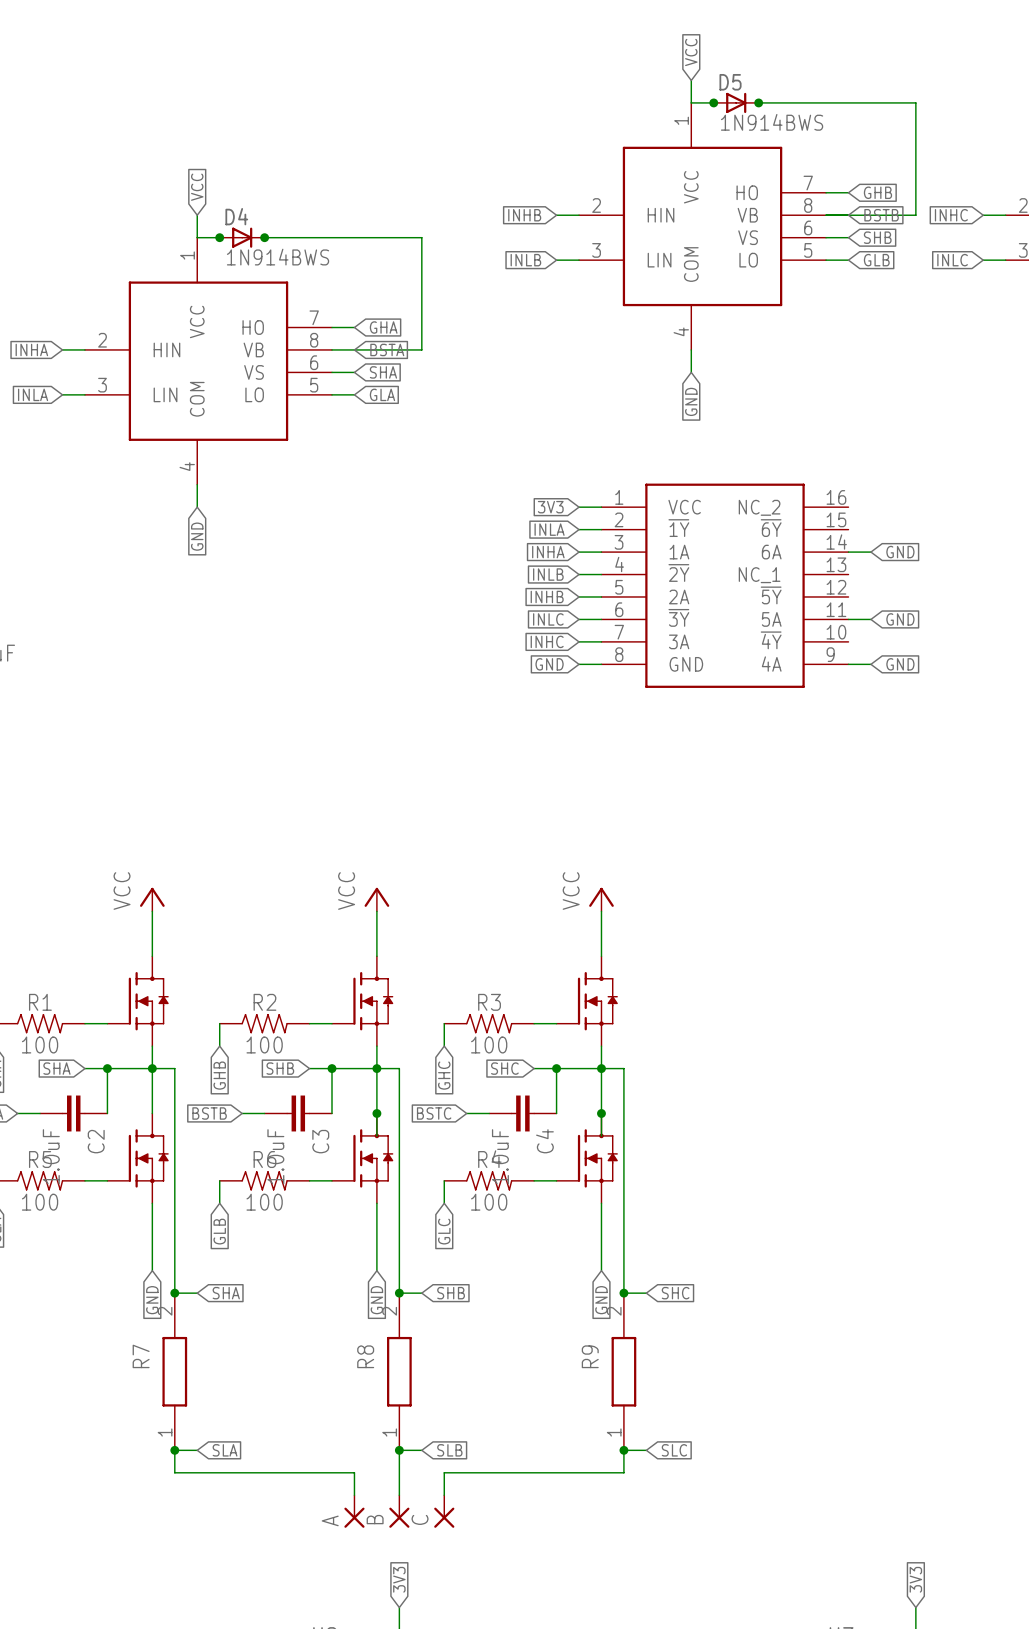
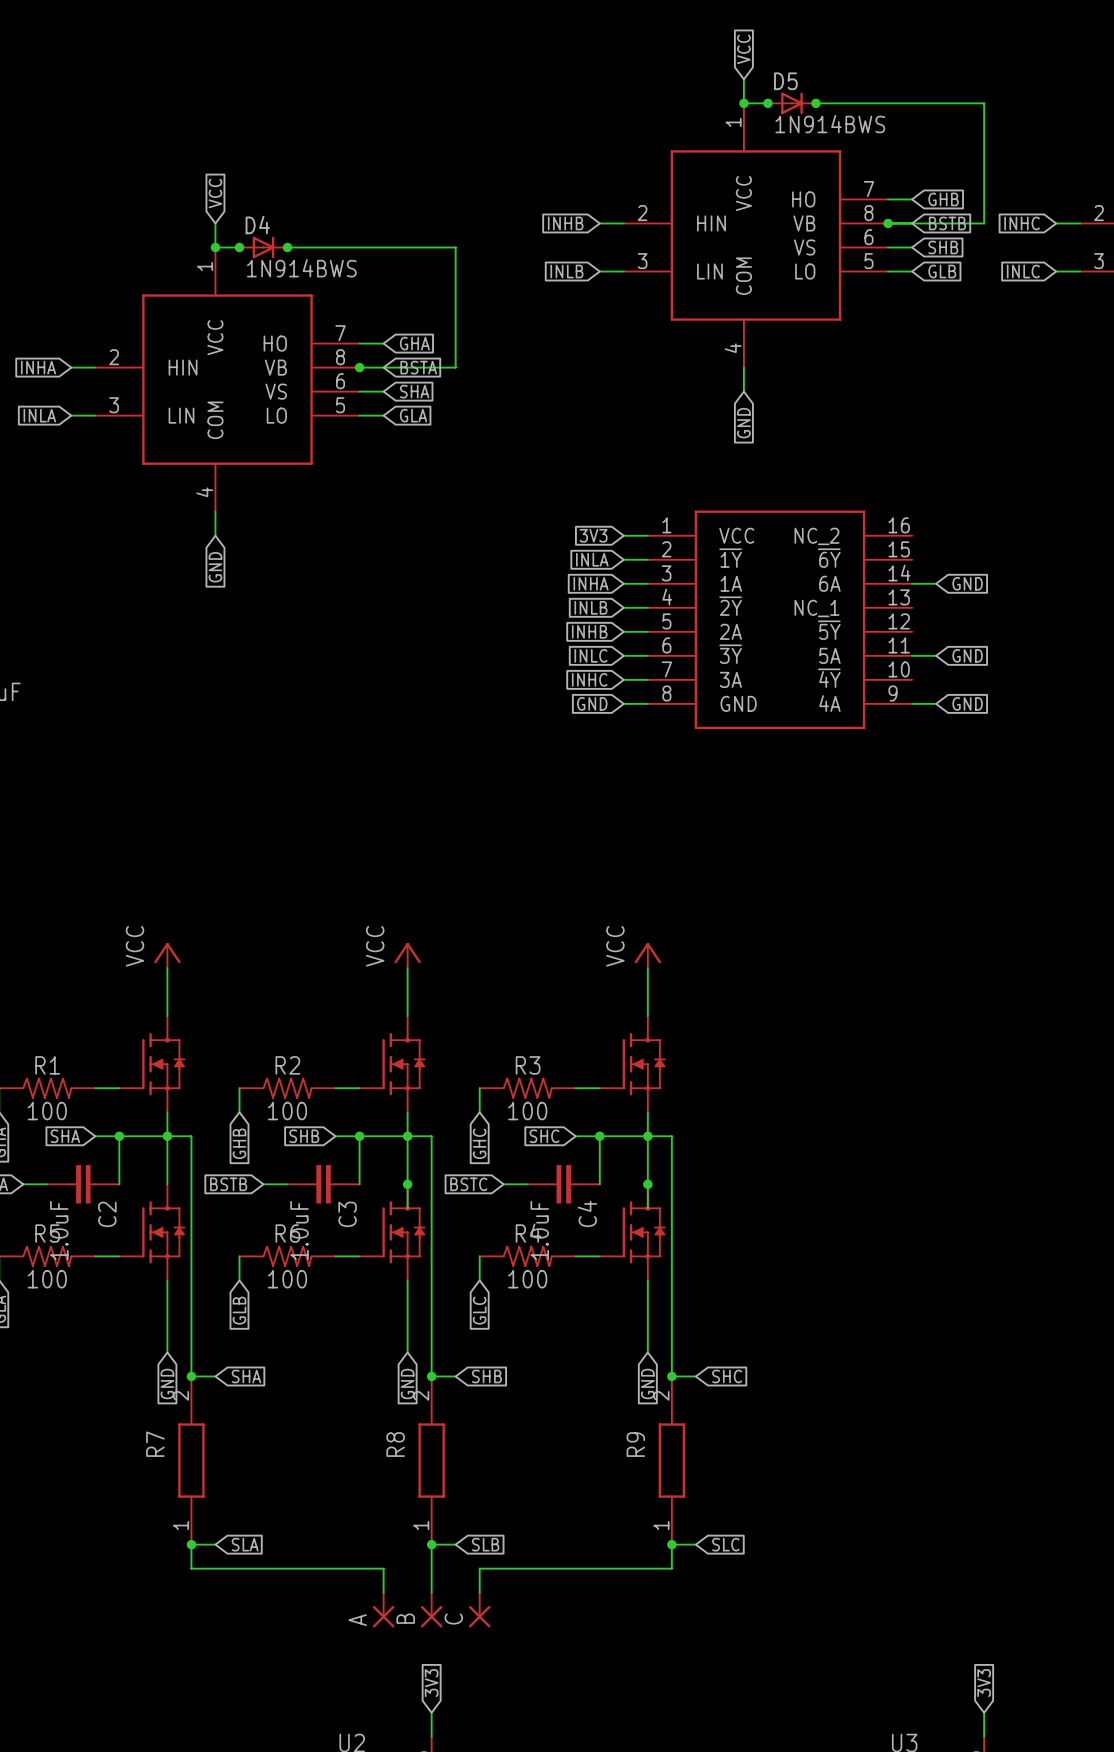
junction: none -> (743, 103)
junction: none -> (888, 223)
junction: none -> (215, 247)
junction: none -> (359, 367)

